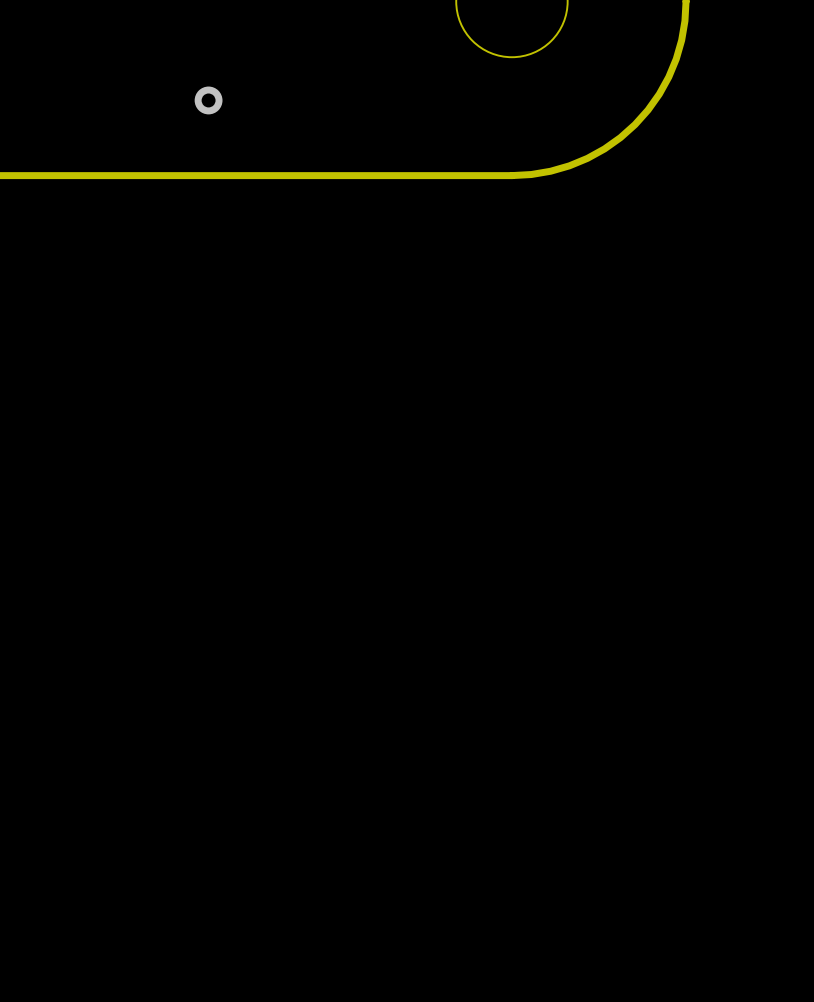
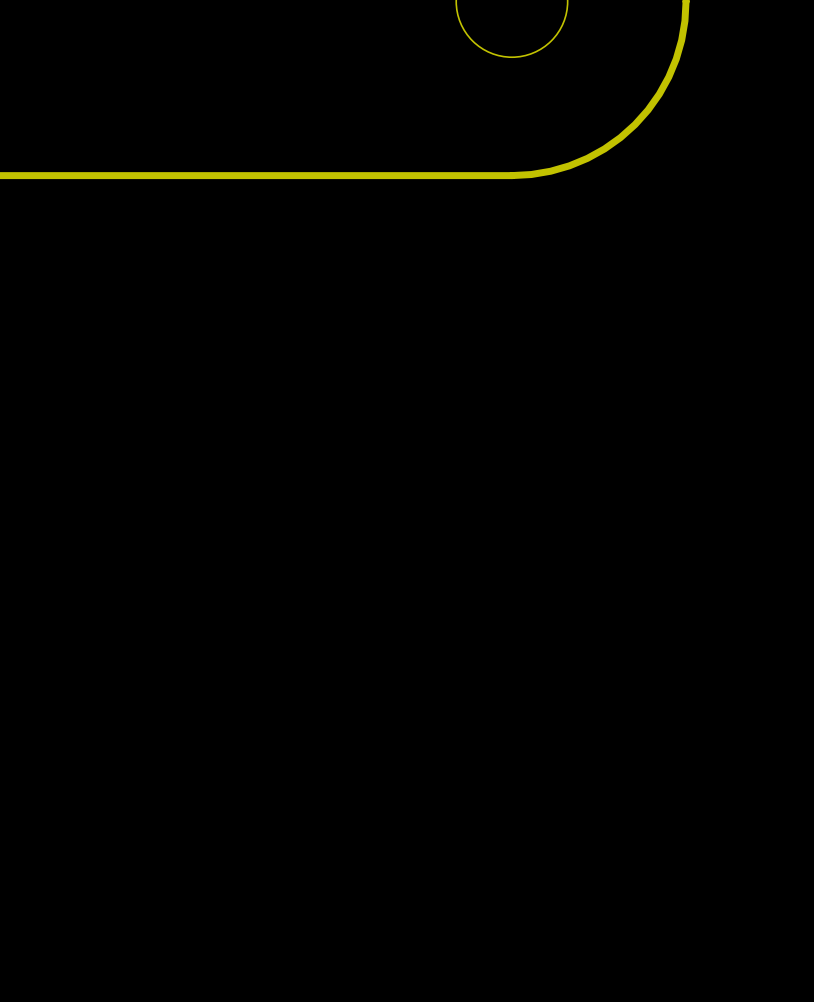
via: (208, 100) -> none

